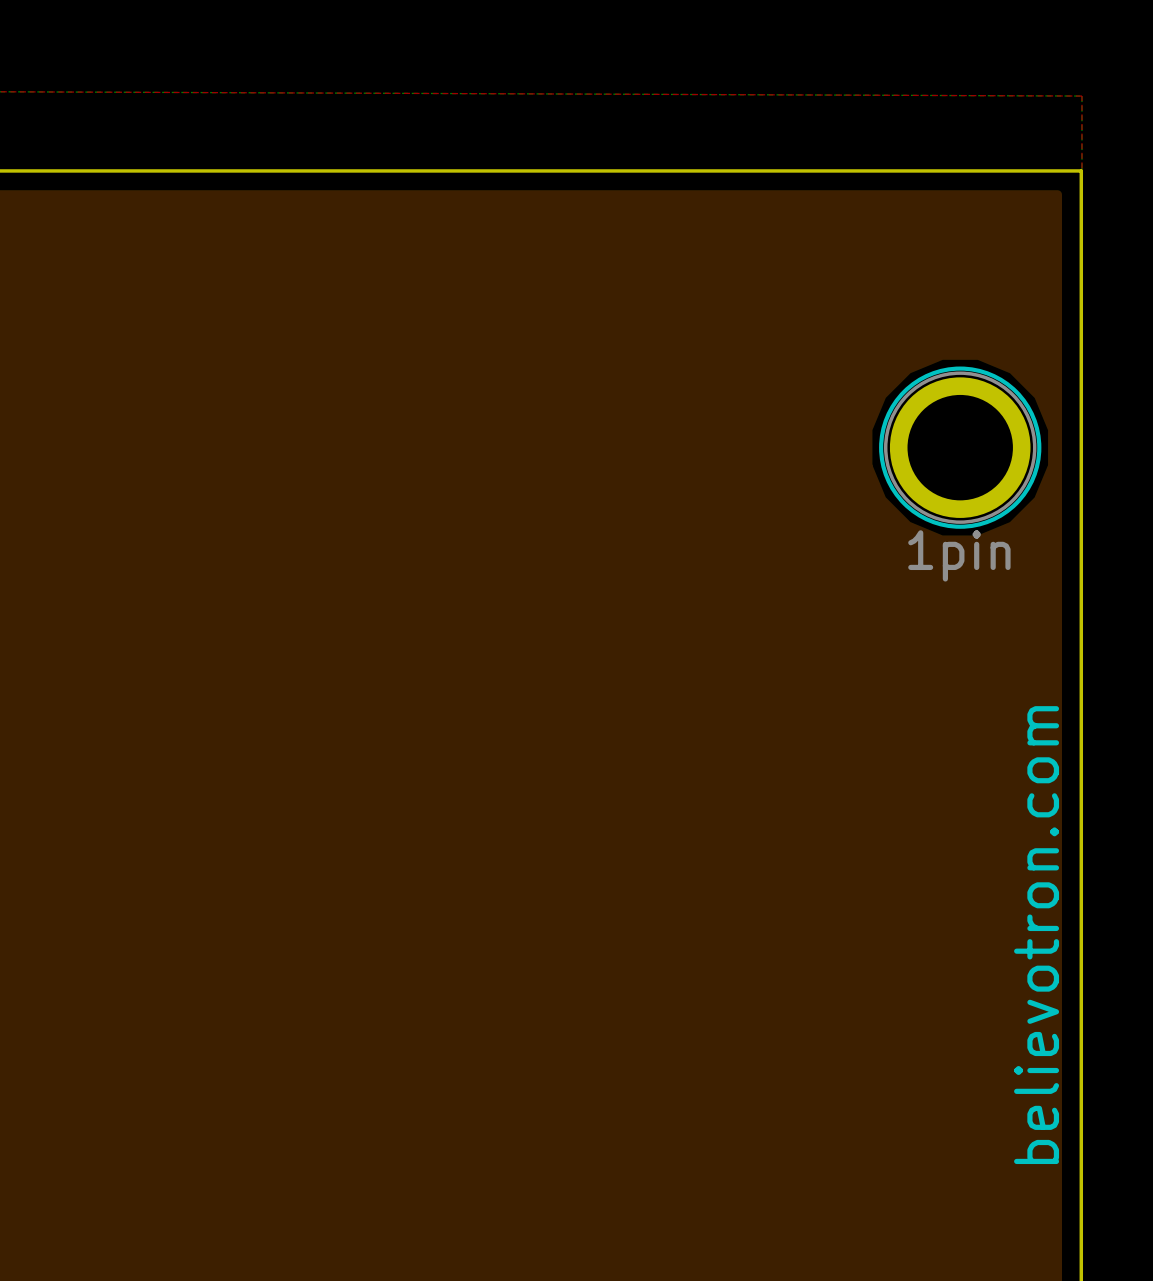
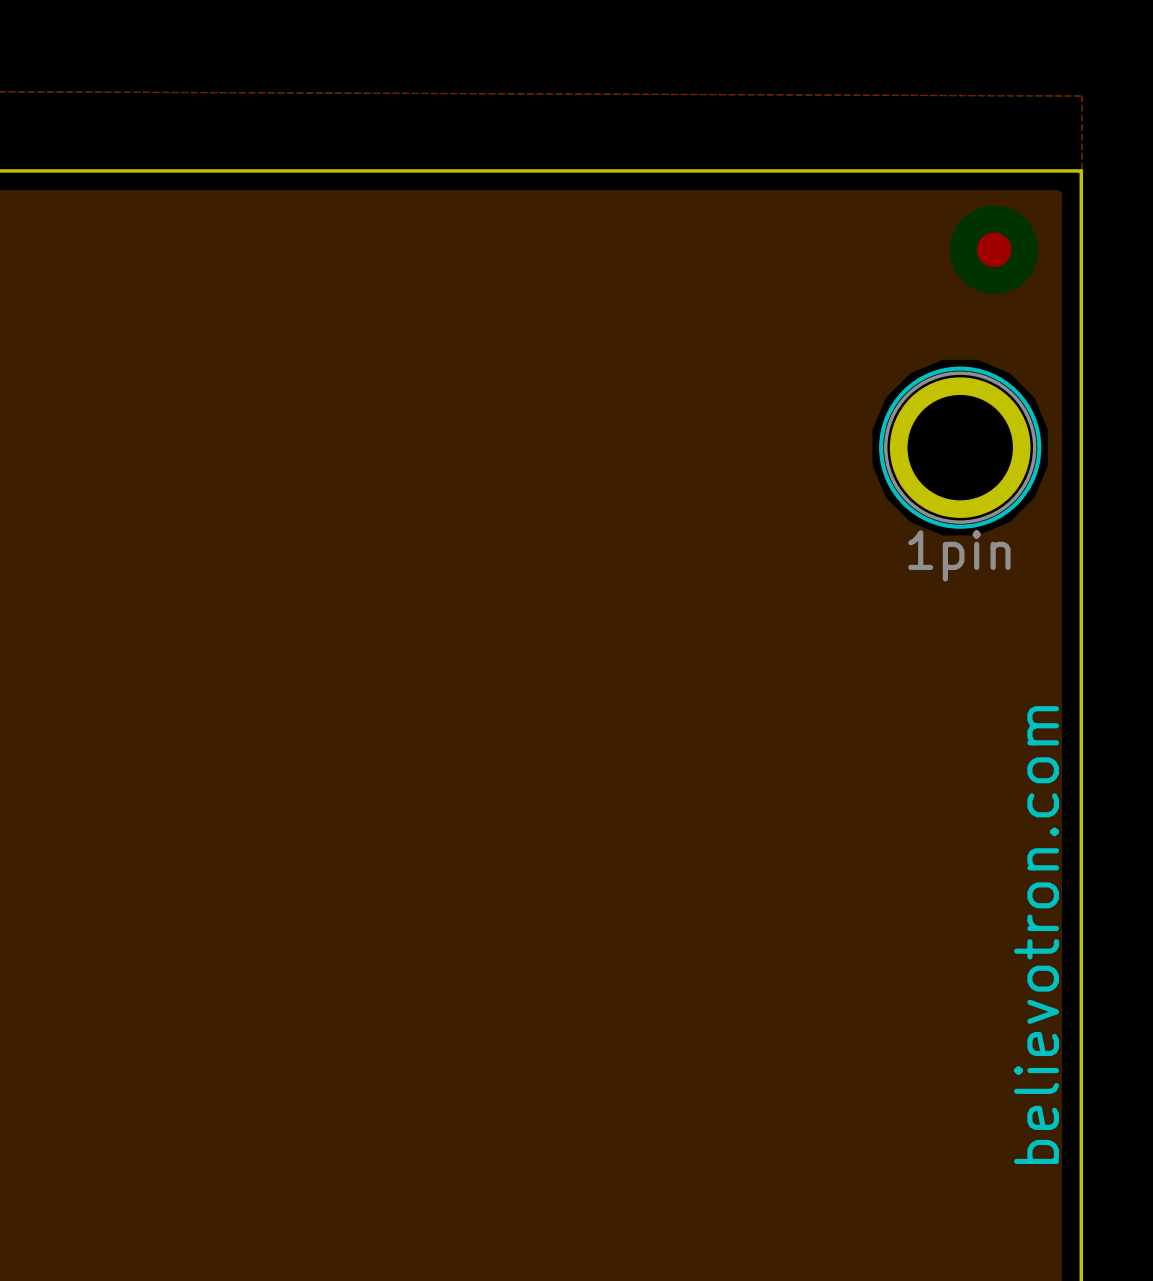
part: none -> (994, 249)

